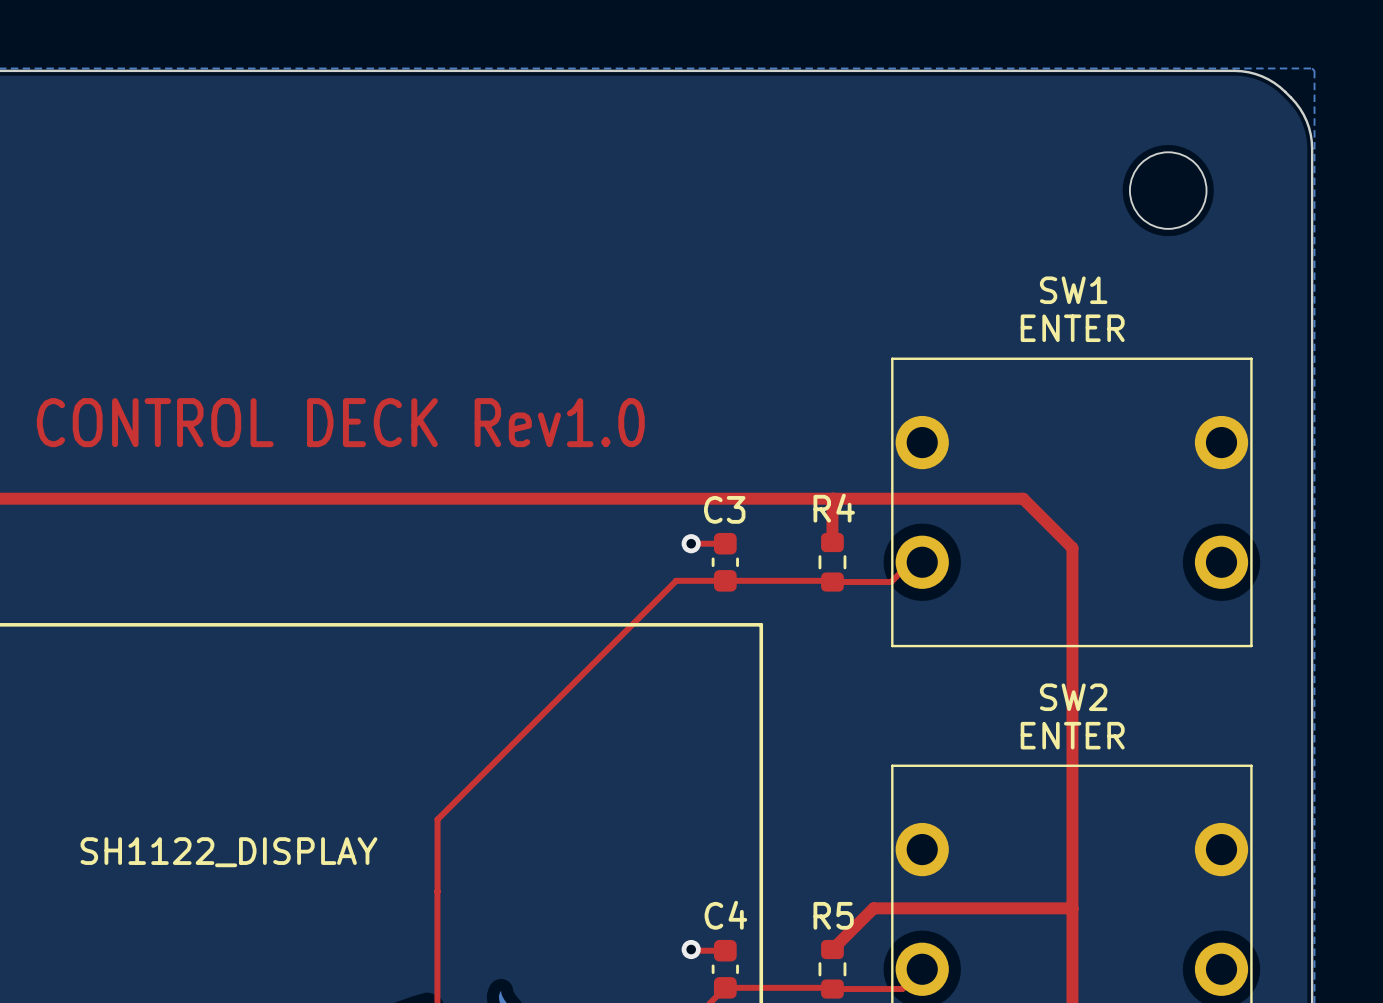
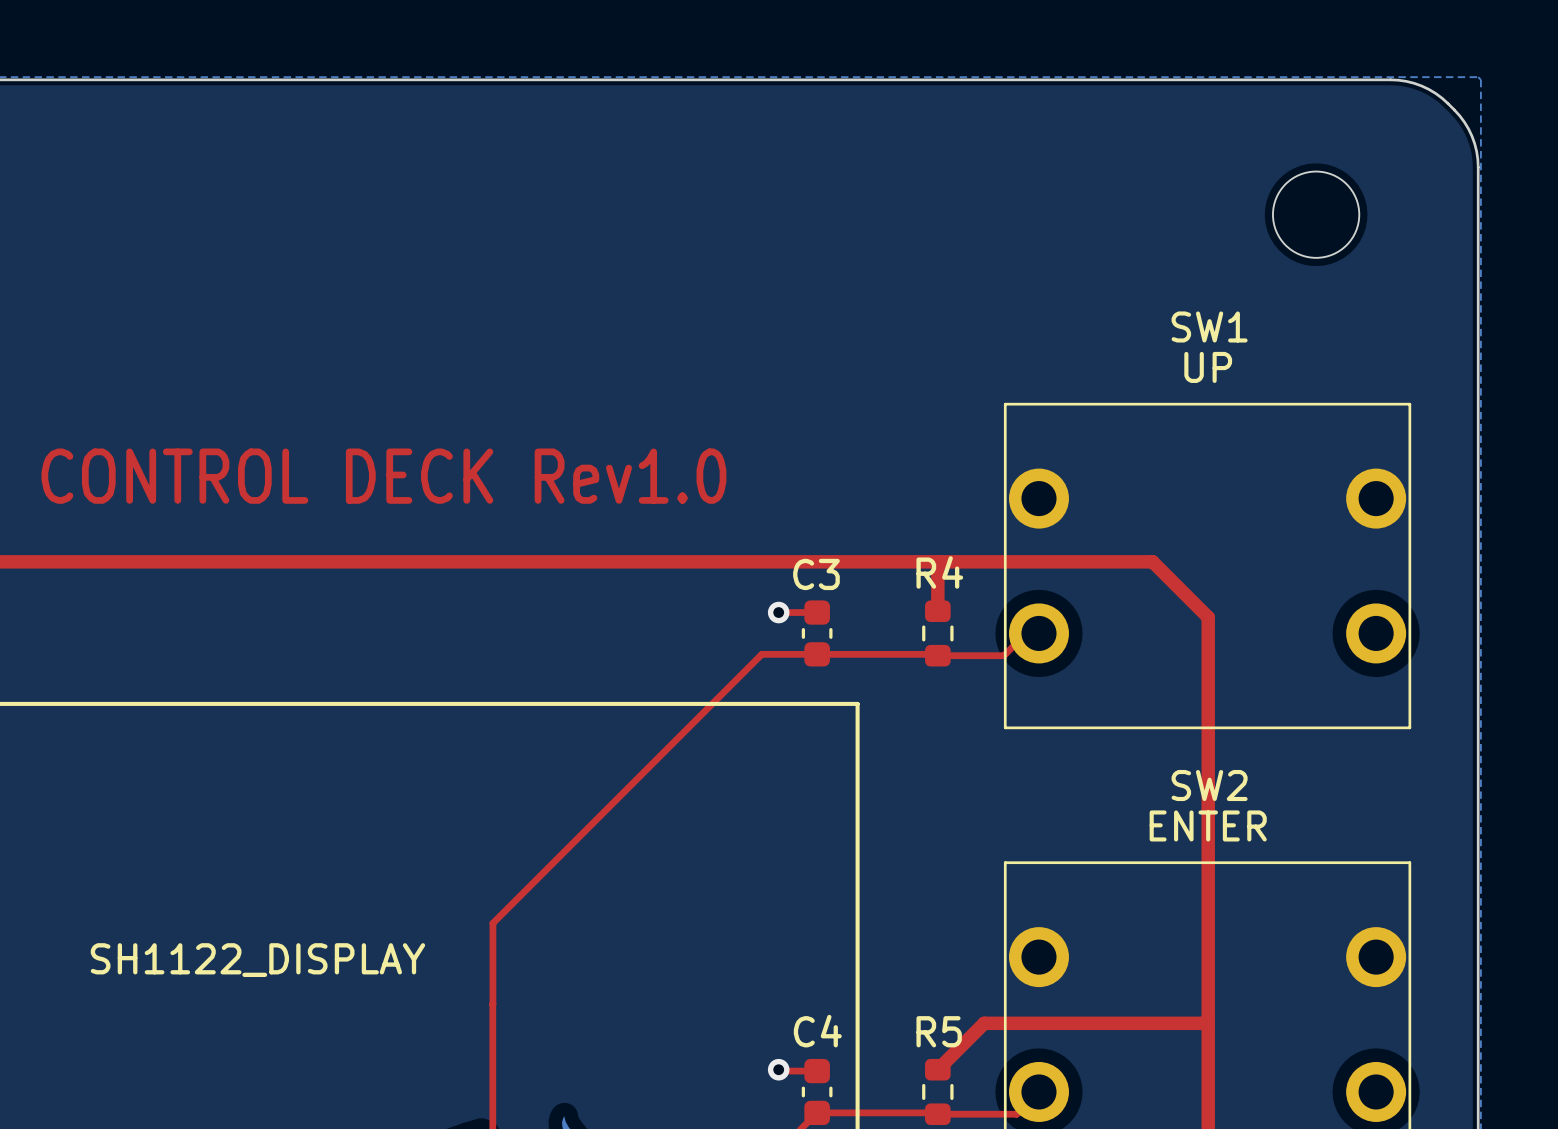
SW1 value: none -> UP (1208, 367)
text: ENTER (1072, 328) -> none
SW2 value: none -> ENTER (1208, 825)
text: ENTER (1072, 735) -> none

